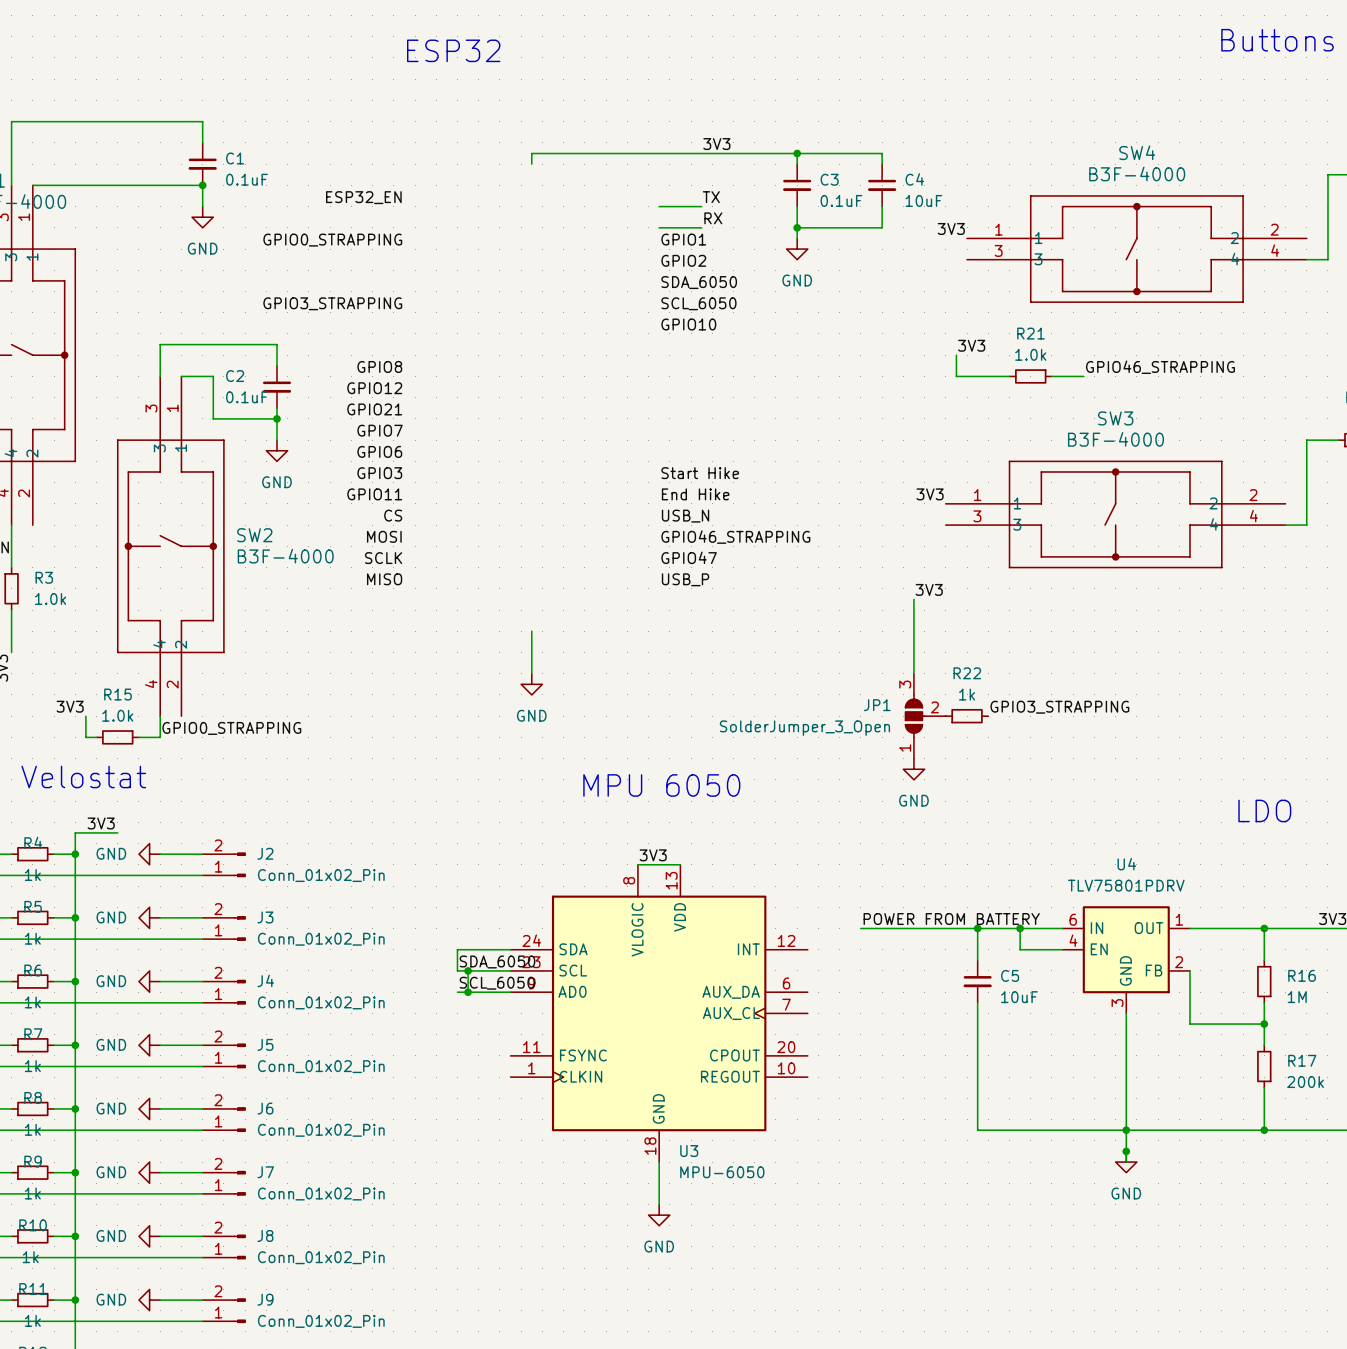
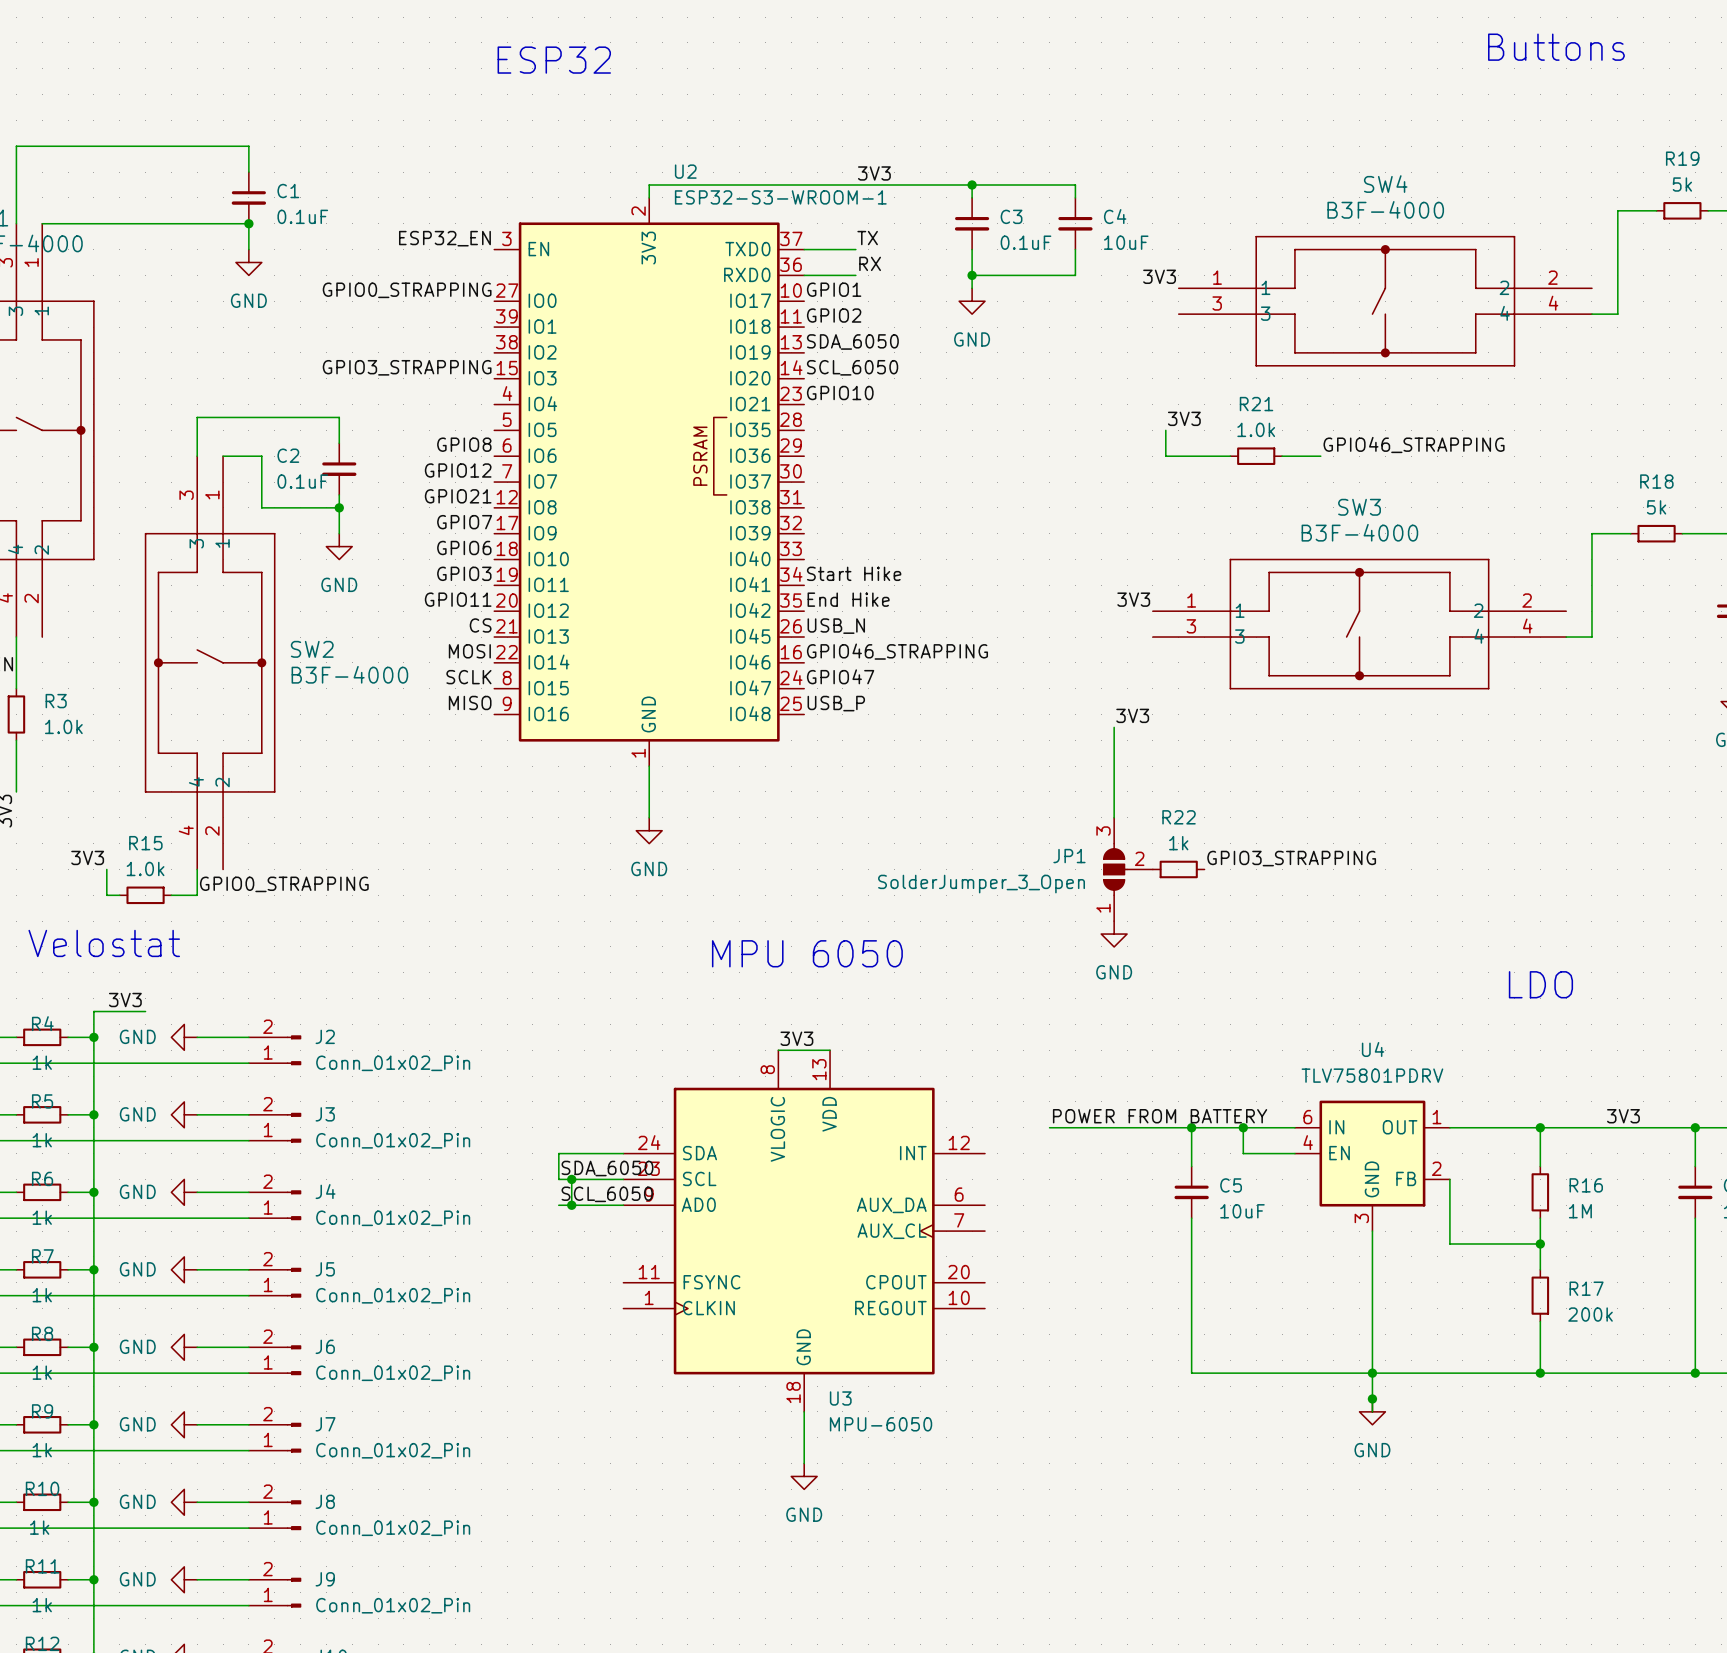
U2: none -> ESP32-S3-WROOM-1 (649, 482)

